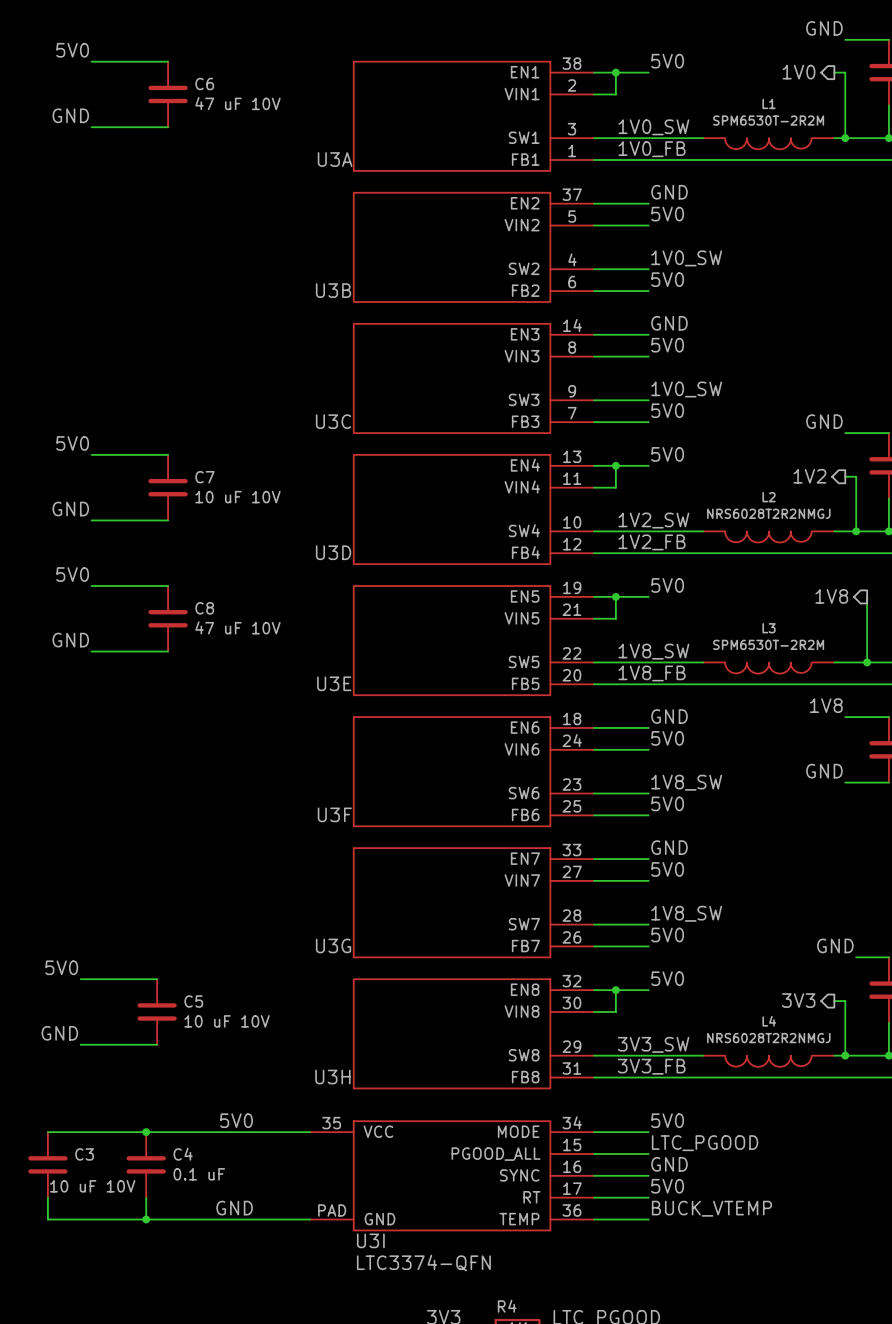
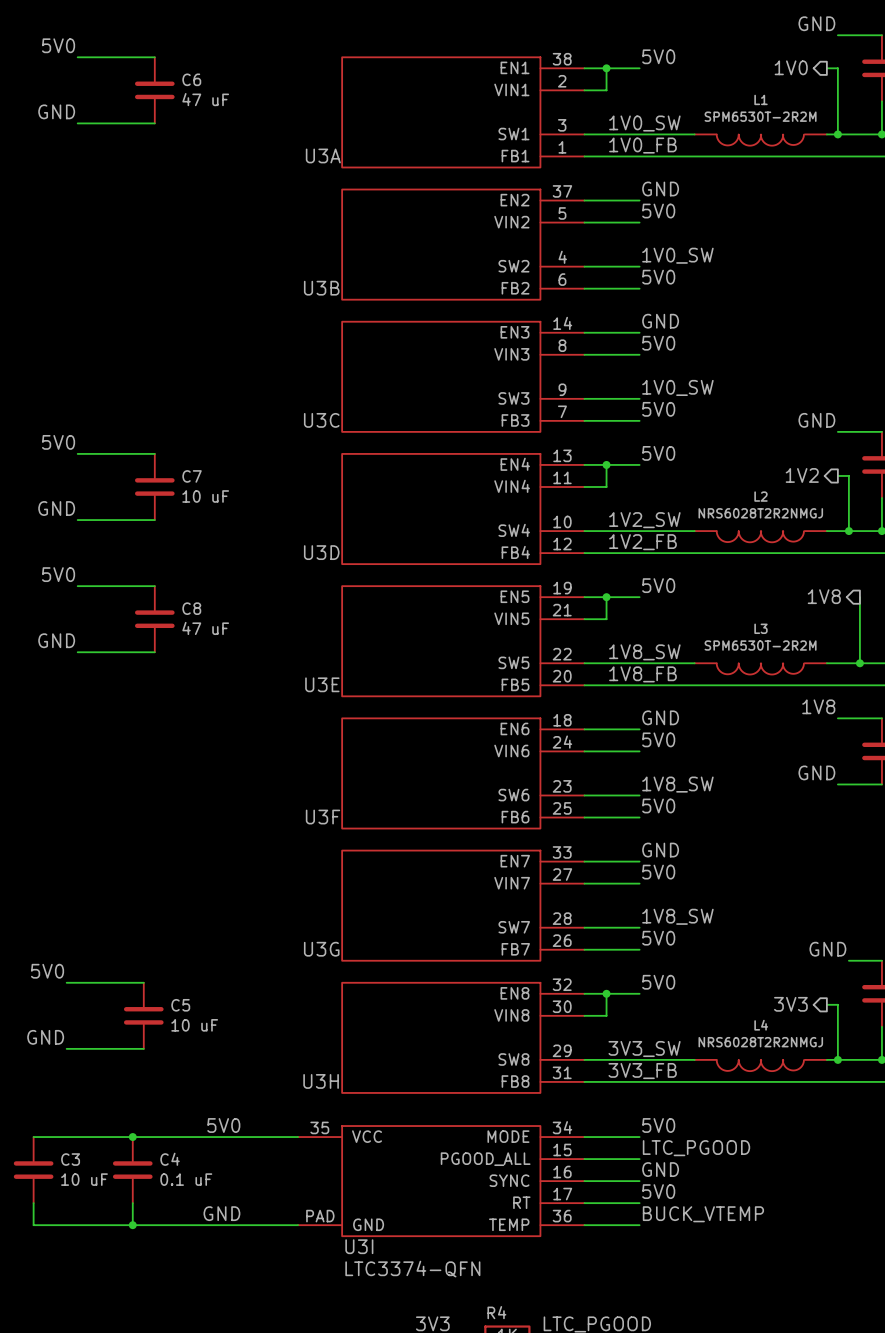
C6 value: 47 uF 10V (237, 103) -> 47 uF (205, 99)
C7 value: 10 uF 10V (237, 497) -> 10 uF (205, 496)
C8 value: 47 uF 10V (237, 627) -> 47 uF (205, 628)
C5 value: 10 uF 10V (227, 1021) -> 10 uF (194, 1025)
C3 value: 10 uF 10V (92, 1186) -> 10 uF (84, 1179)

